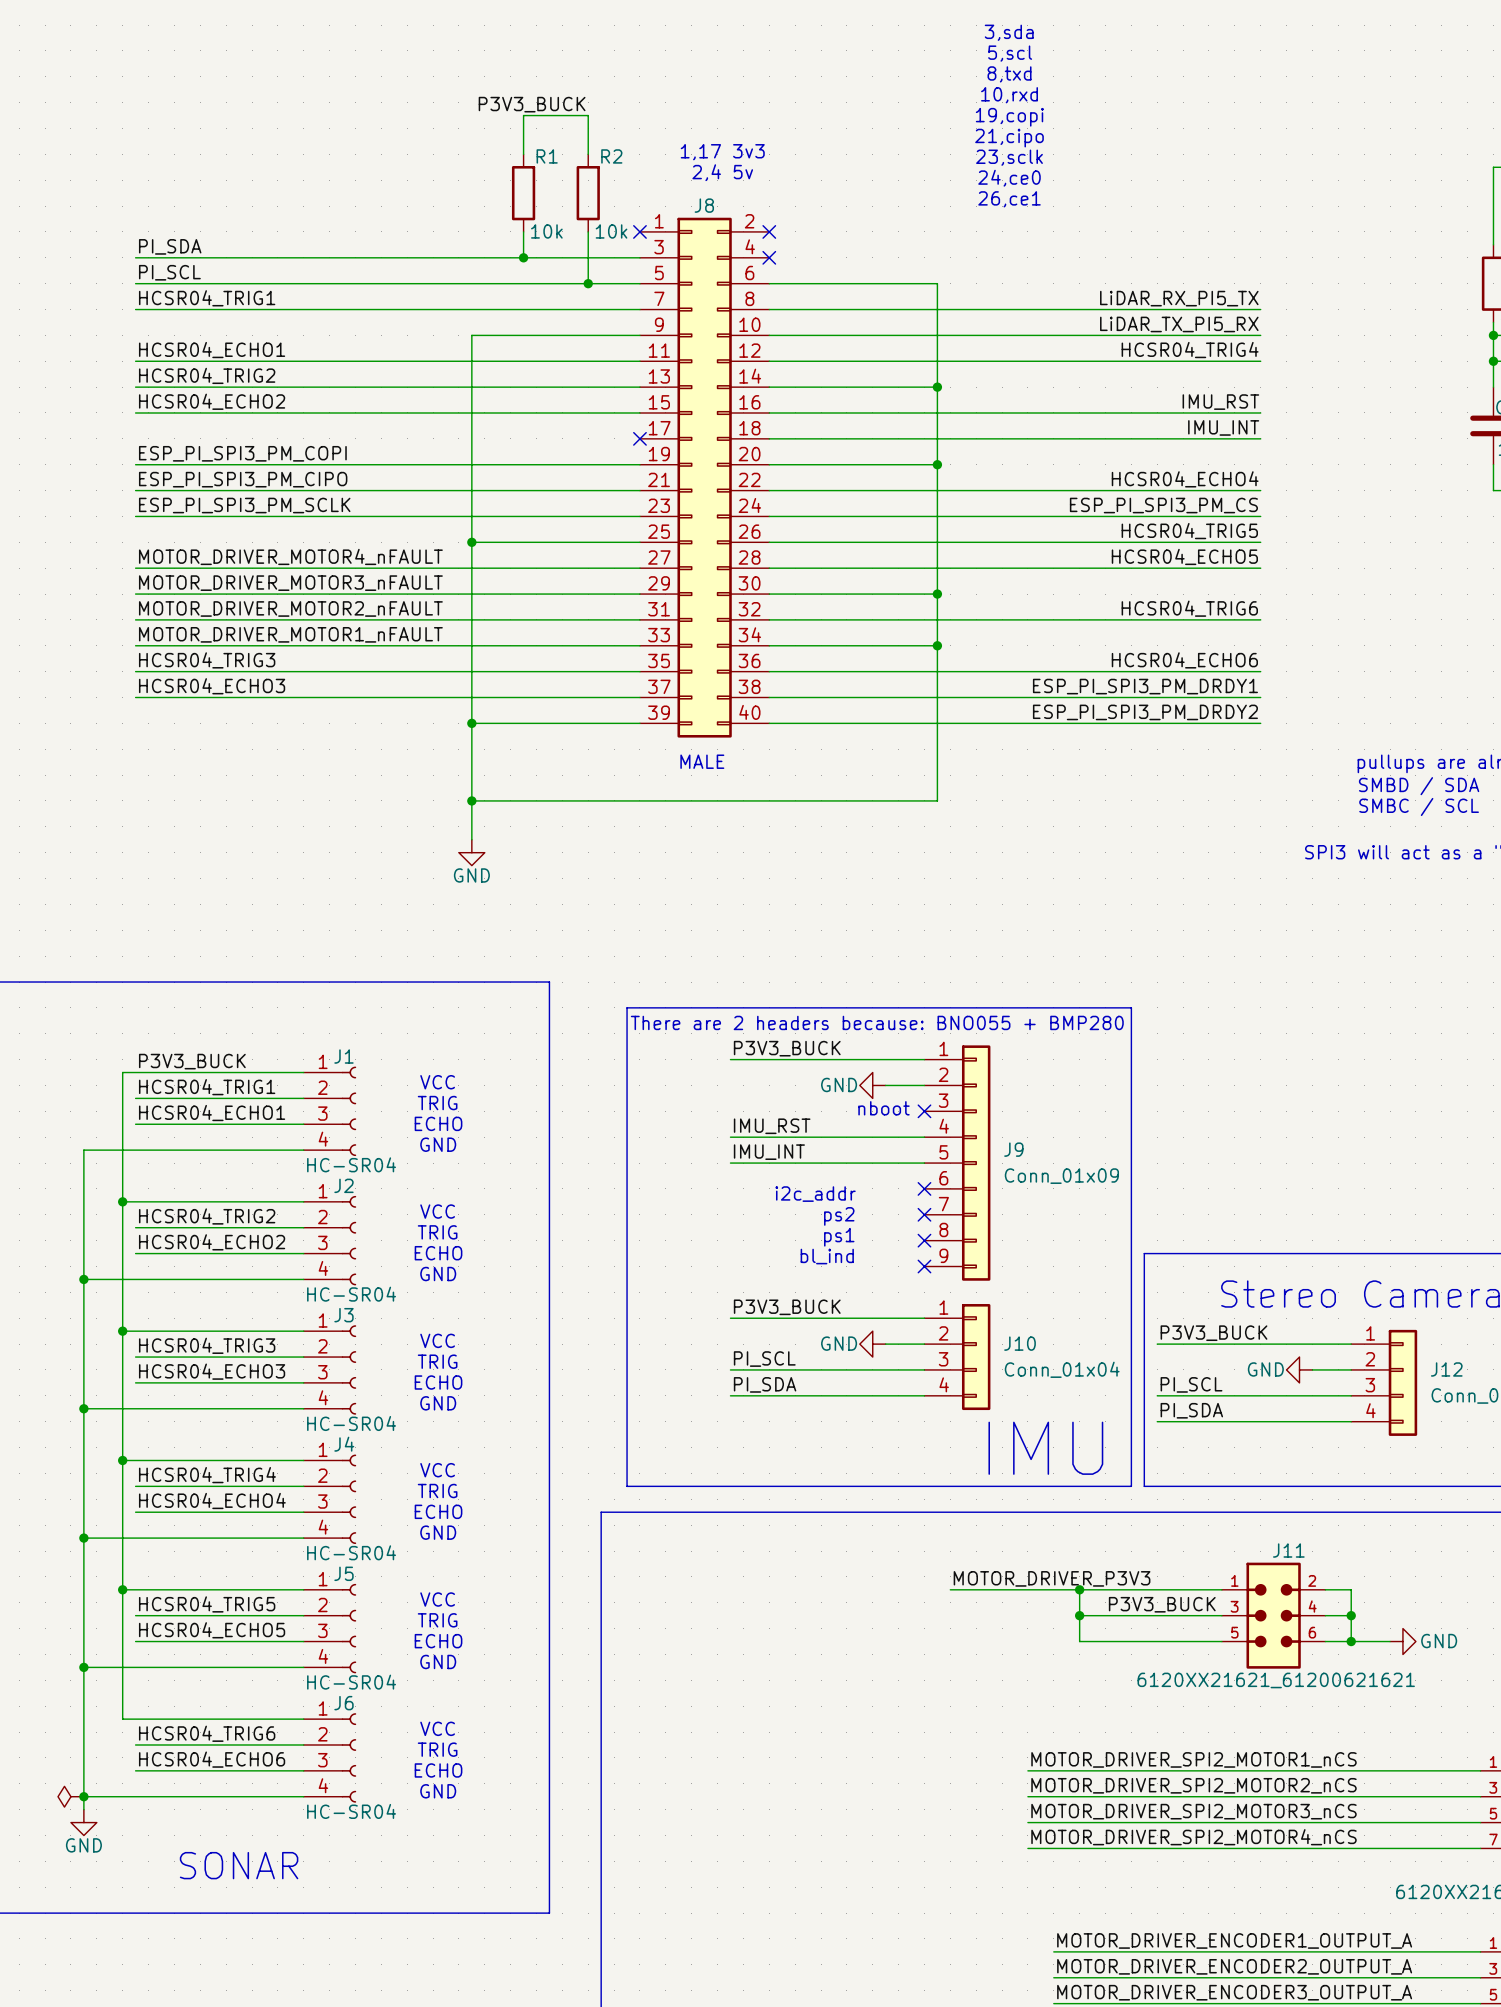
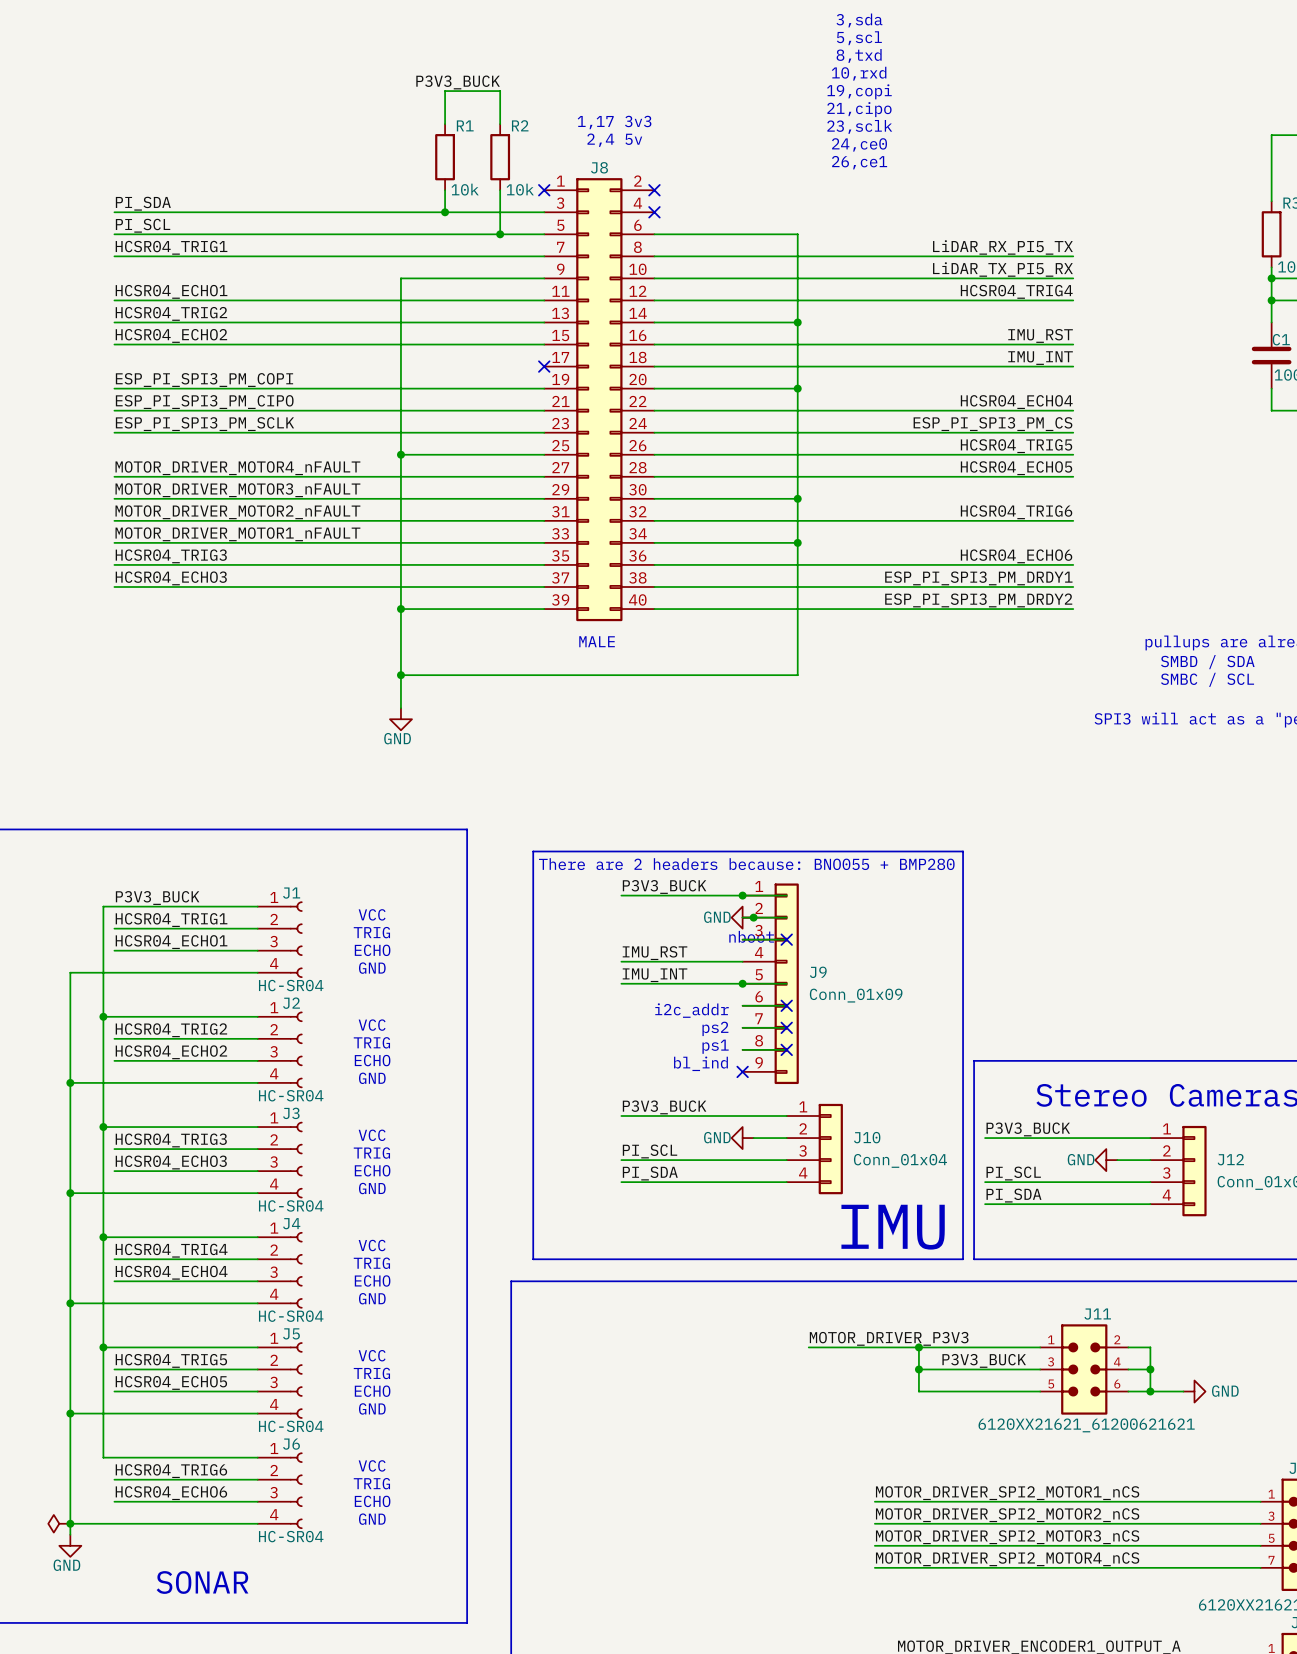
junction: none -> (742, 895)
junction: none -> (753, 917)
junction: none -> (742, 983)
J9 position: (957, 1163) -> (770, 983)
wire: none -> (742, 1005) (786, 1005)
wire: none -> (742, 1027) (786, 1027)
wire: none -> (742, 1049) (786, 1049)
no-connect mark position: (924, 1266) -> (742, 1071)

